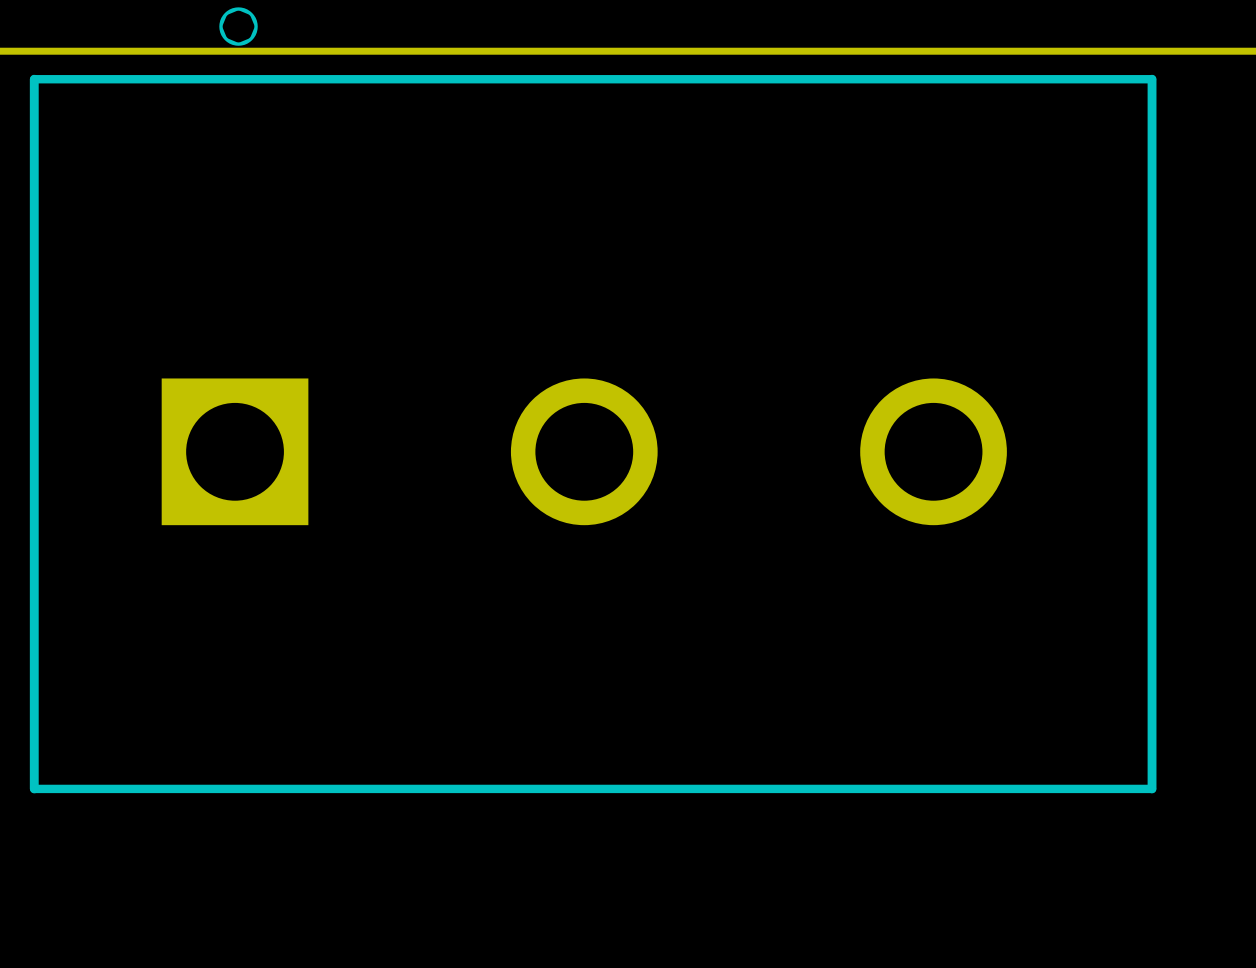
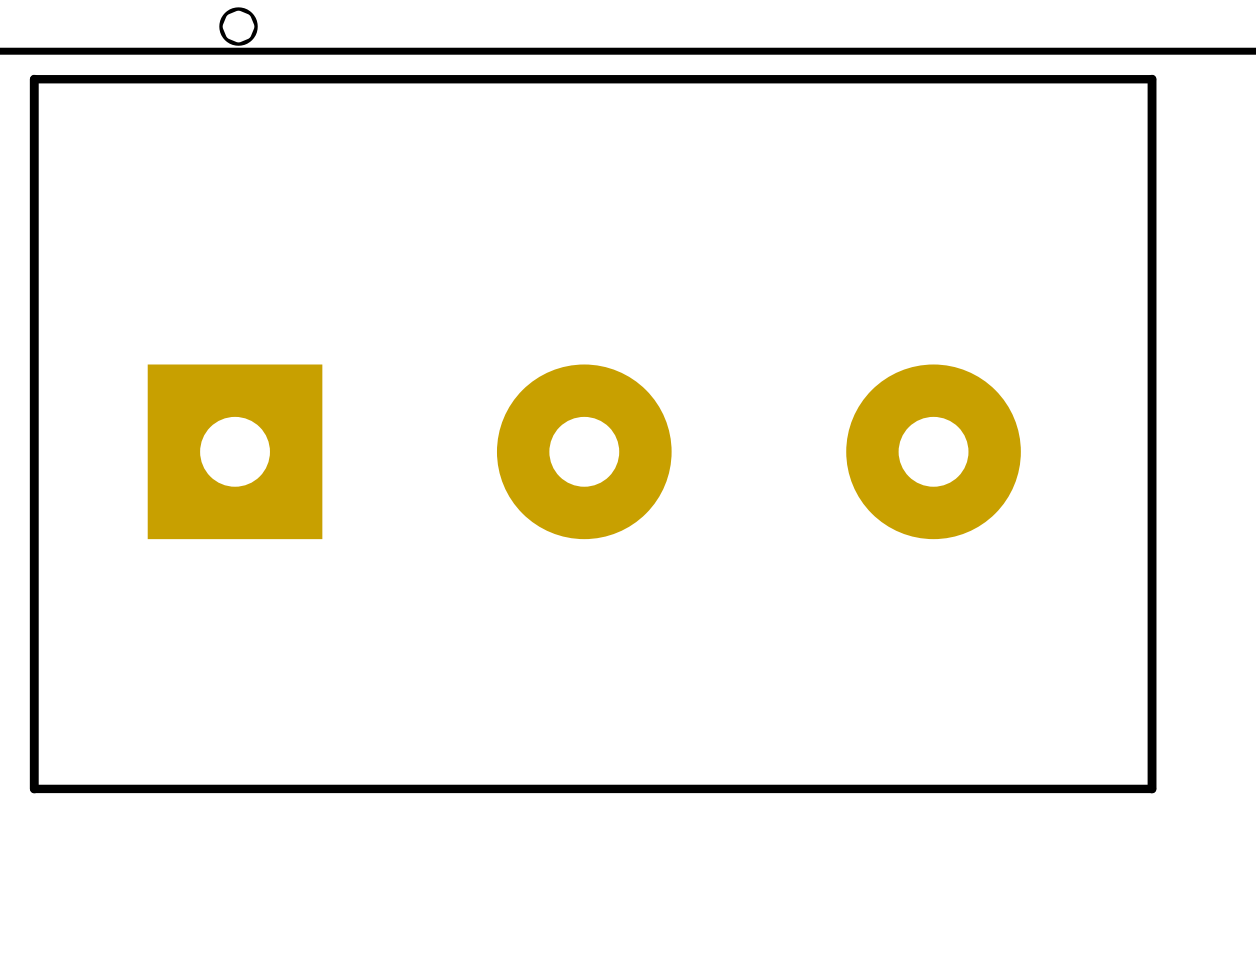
part footprint: [29, 7, 1157, 794] -> [29, 7, 1157, 794]

